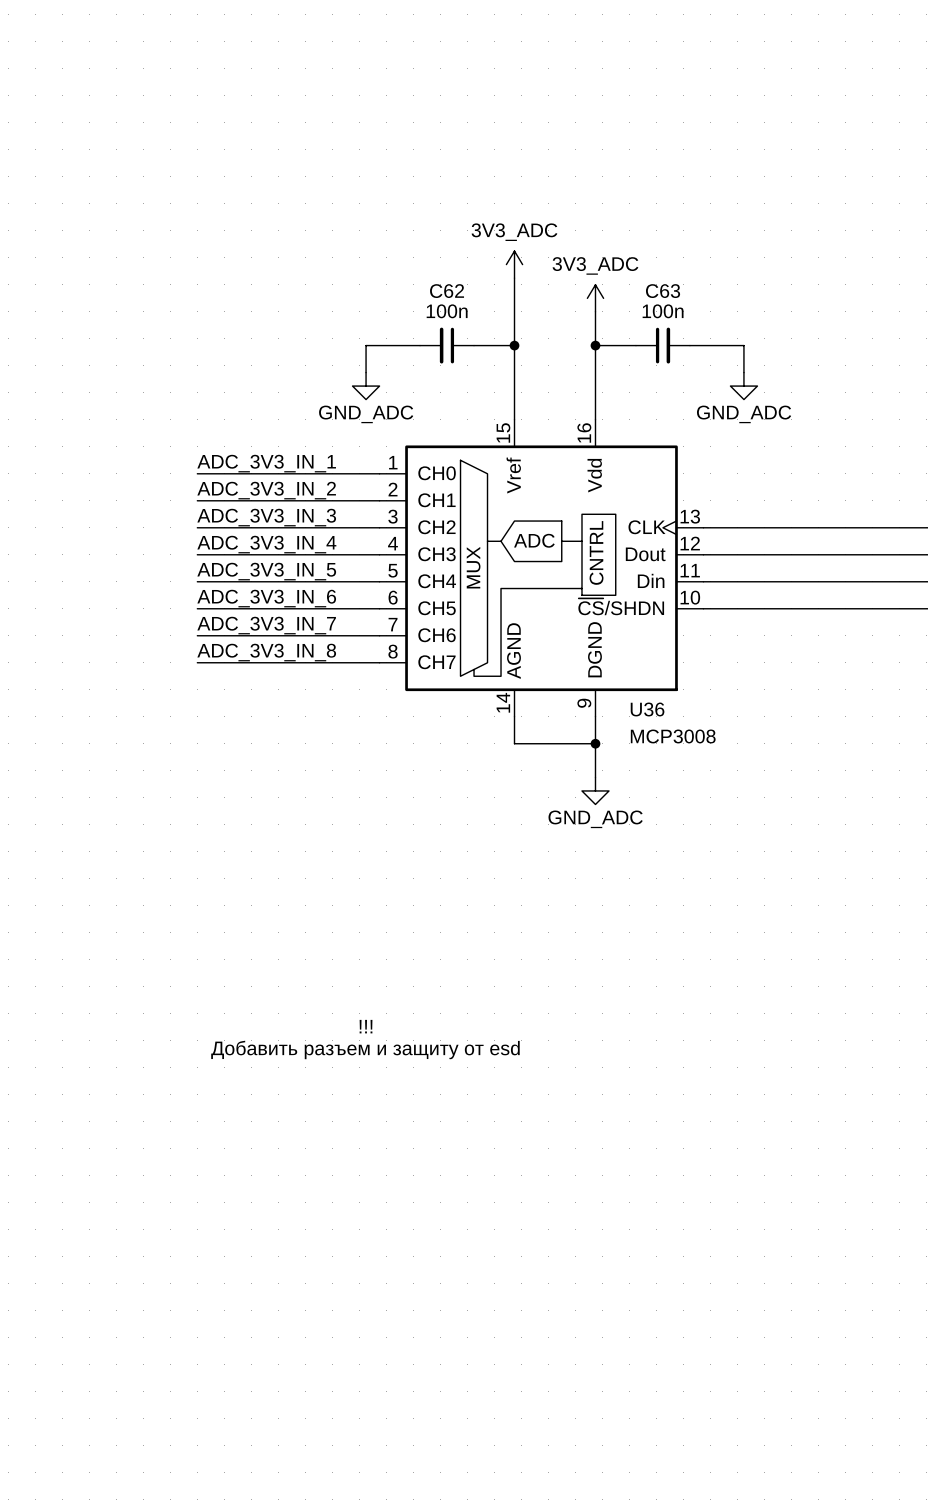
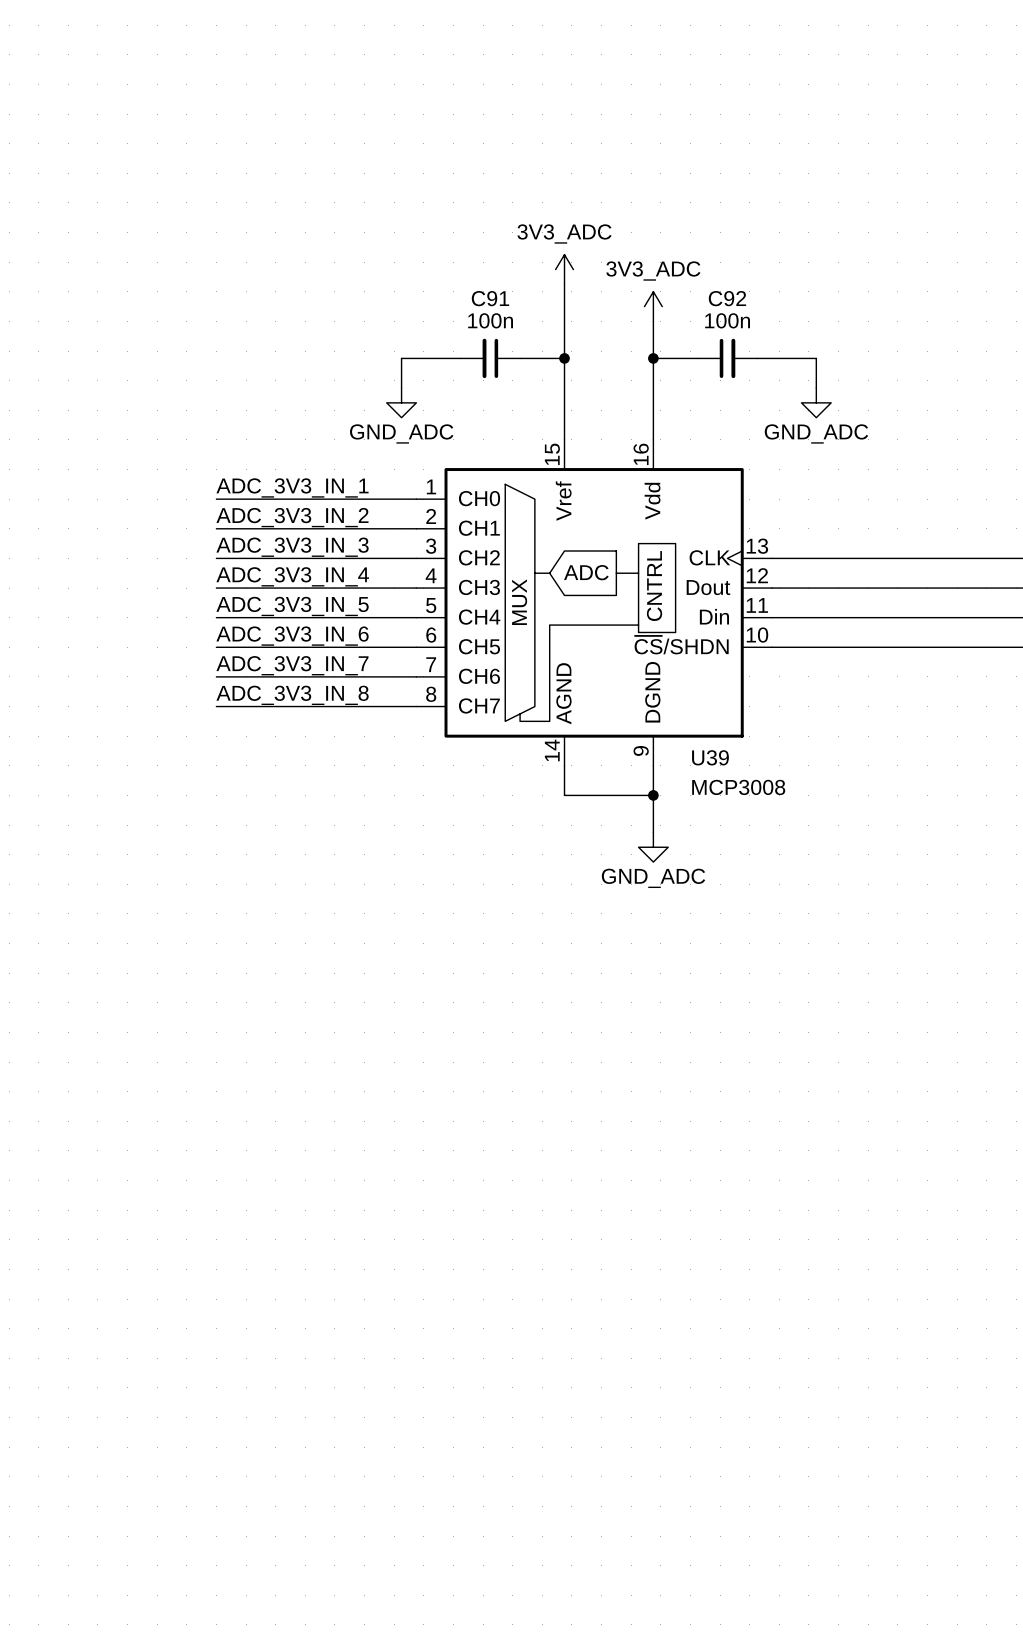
C62 name: C62 (447, 291) -> C91 (490, 298)
C63 name: C63 (663, 291) -> C92 (727, 298)
U36 name: U36 (647, 709) -> U39 (710, 757)
text: !!! (366, 1026) -> none
text: Добавить разъем и защиту от esd (365, 1049) -> none

